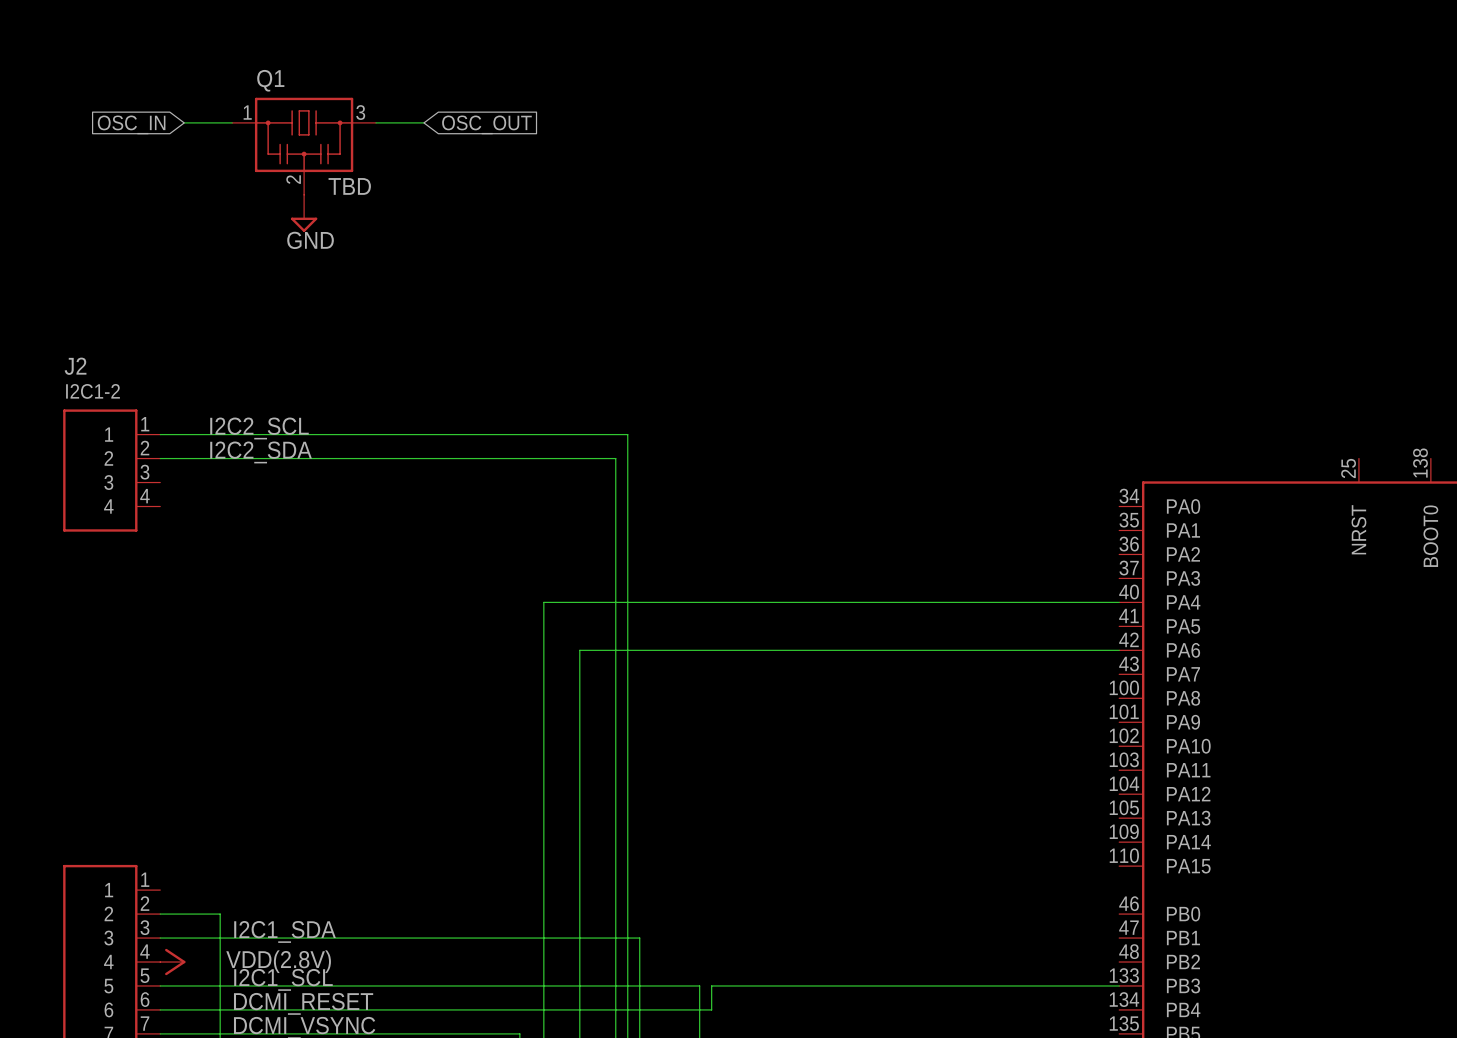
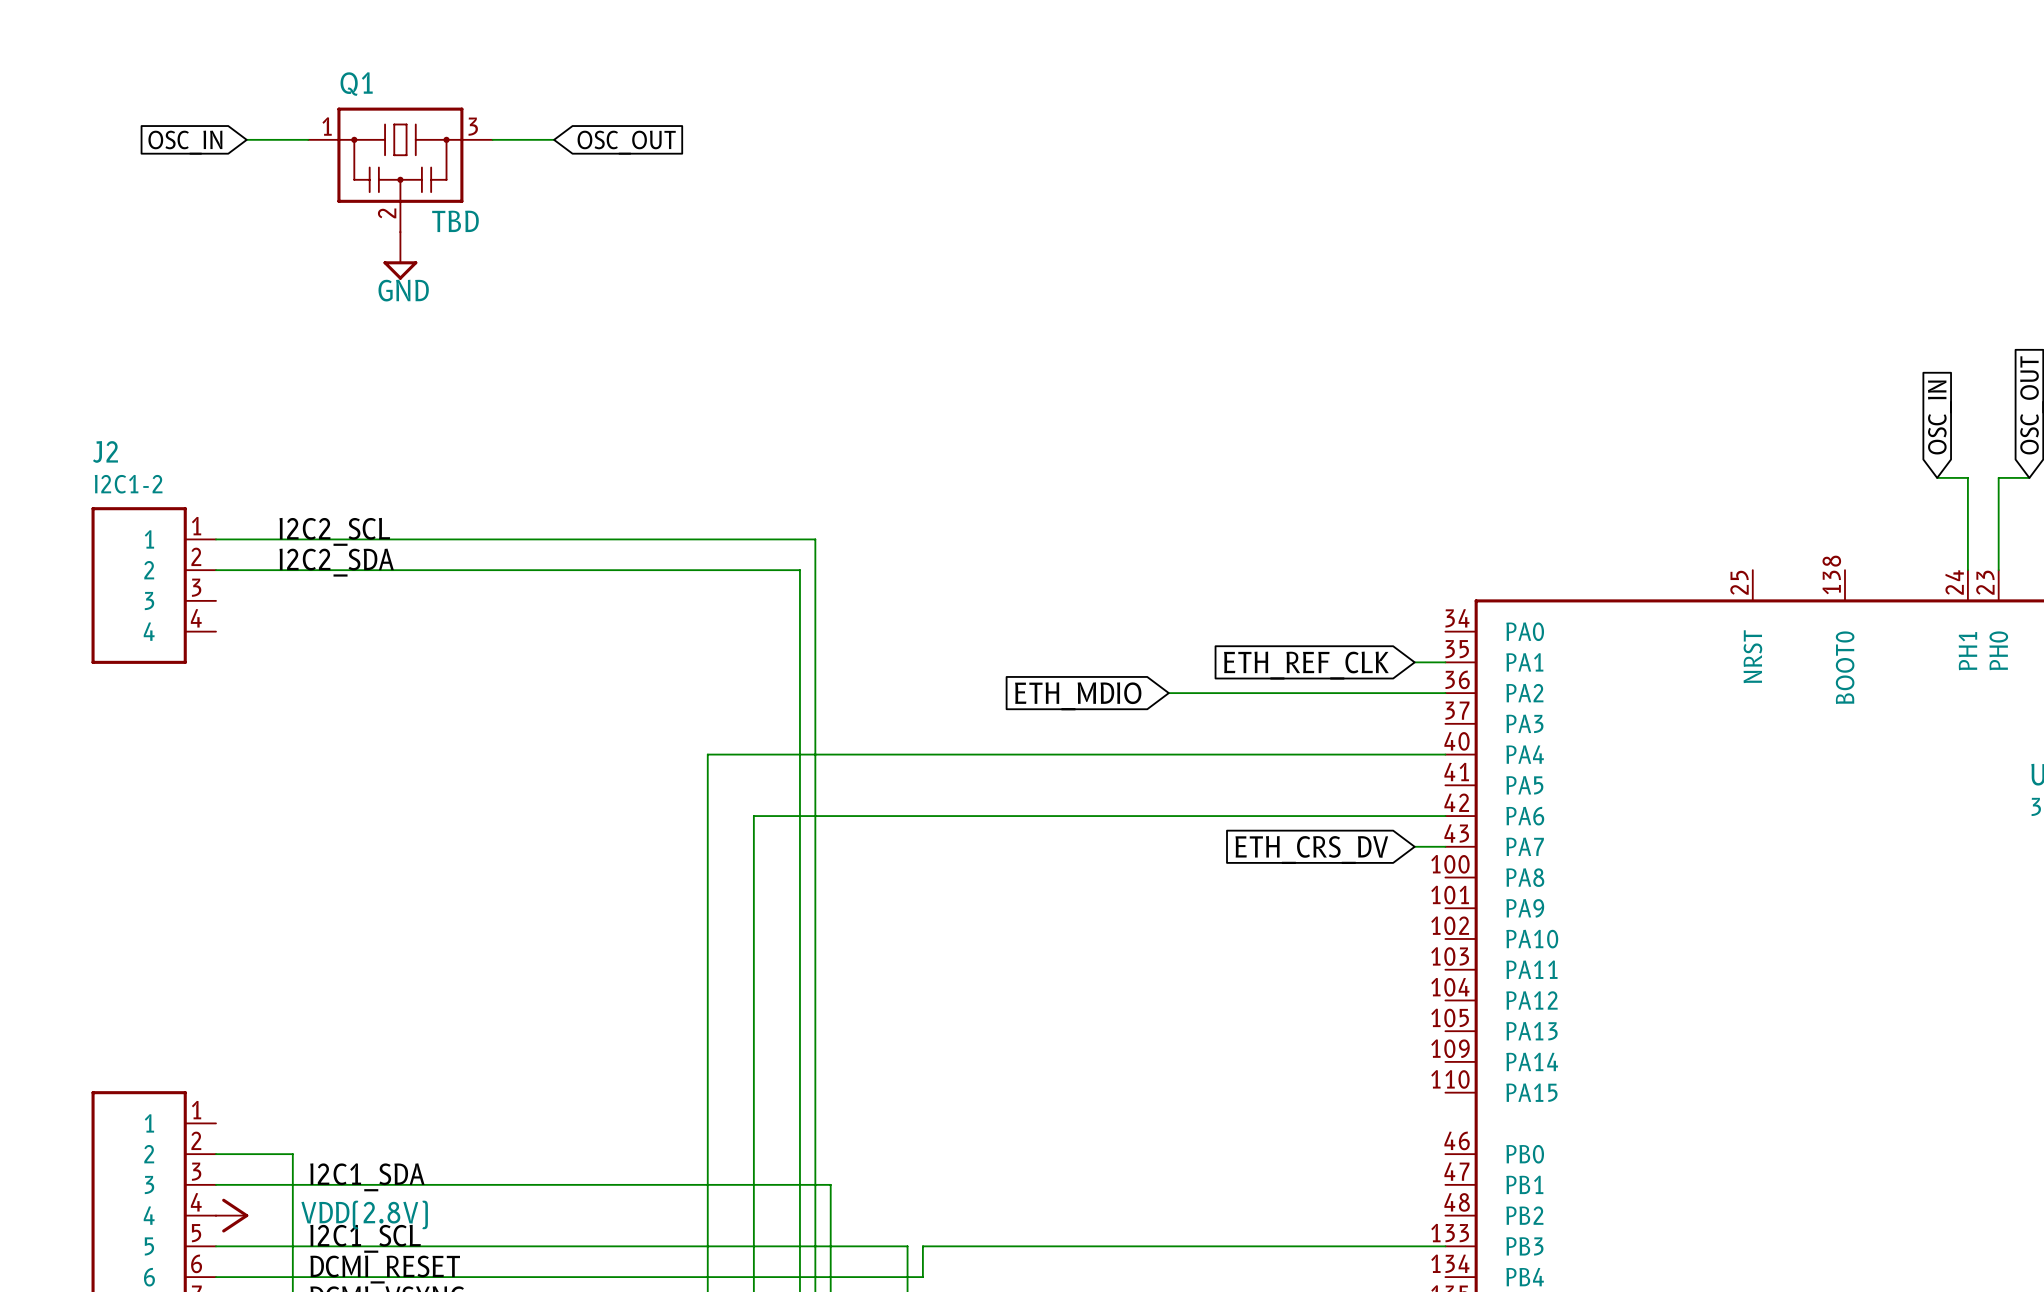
wire: none -> (1414, 662) (1445, 662)
global label: none -> ETH_REF_CLK (1306, 665)
wire: none -> (1168, 693) (1445, 693)
global label: none -> ETH_MDIO (1078, 696)
wire: none -> (1414, 846) (1445, 846)
global label: none -> ETH_CRS_DV (1311, 850)

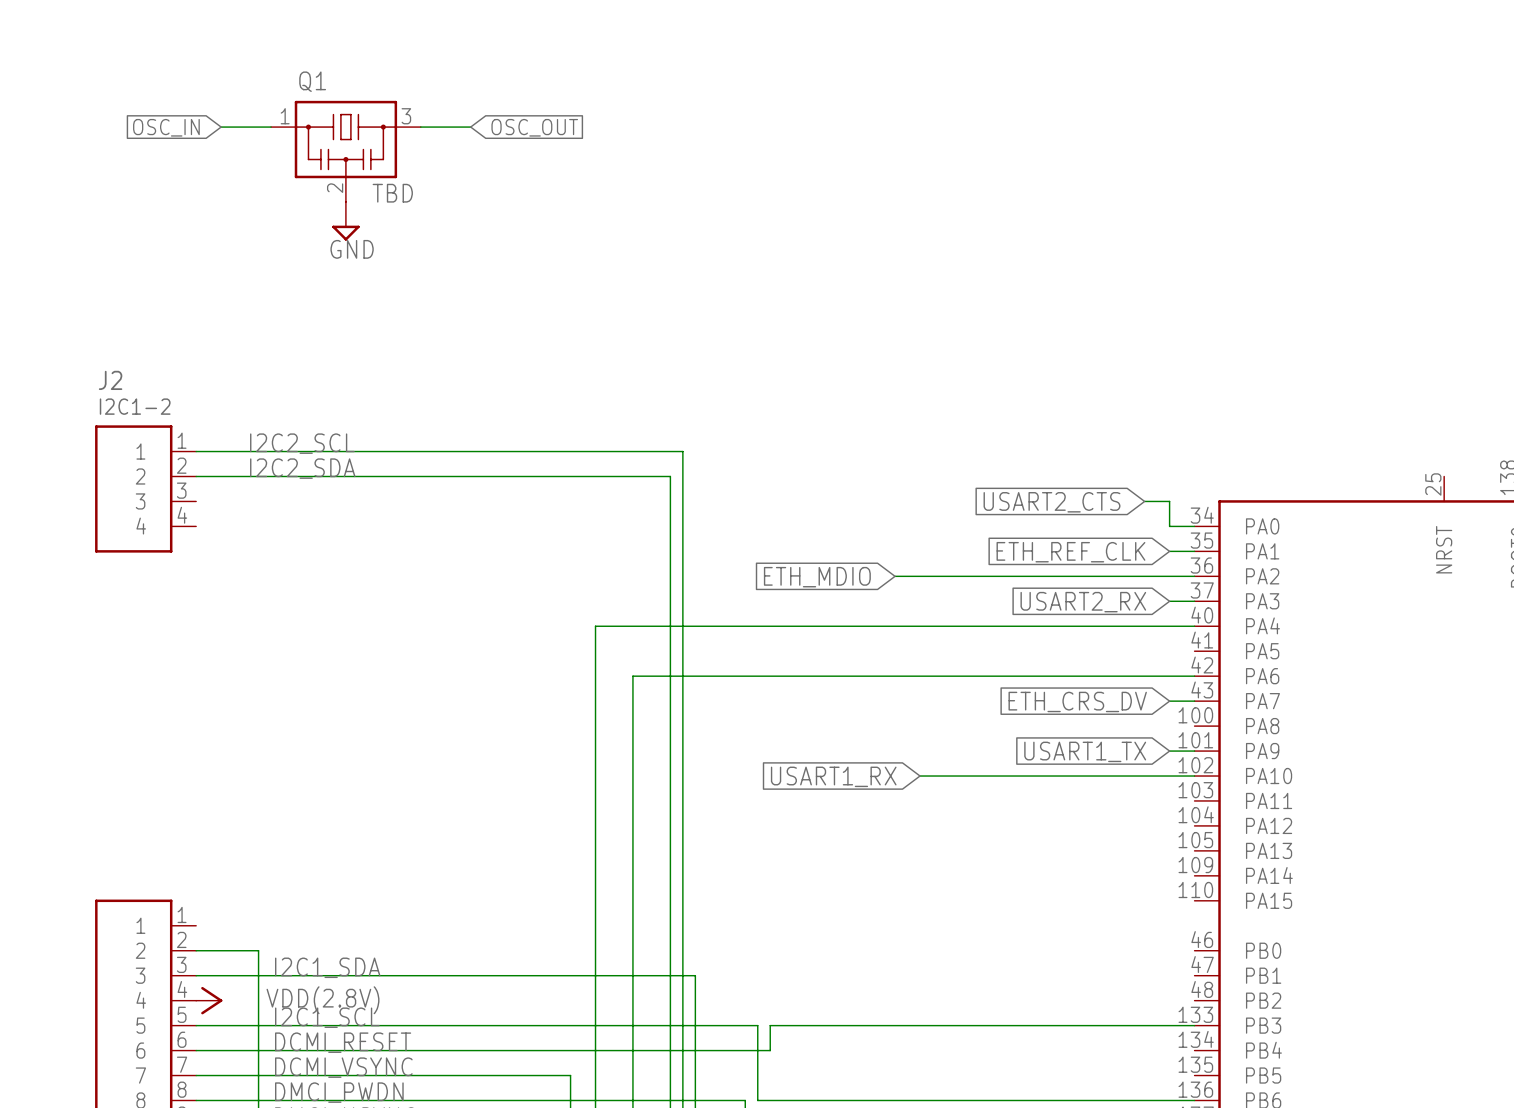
wire: none -> (1144, 501) (1169, 501) (1169, 526) (1194, 526)
global label: none -> USART2_CTS (1051, 502)
wire: none -> (895, 576) (969, 576)
global label position: ETH_MDIO (1078, 696) -> ETH_MDIO (817, 577)
wire: none -> (1169, 601) (1194, 601)
global label: none -> USART2_RX (1083, 602)
wire: none -> (1169, 751) (1194, 751)
global label: none -> USART1_TX (1085, 751)
wire: none -> (920, 776) (1194, 776)
global label: none -> USART1_RX (833, 776)

